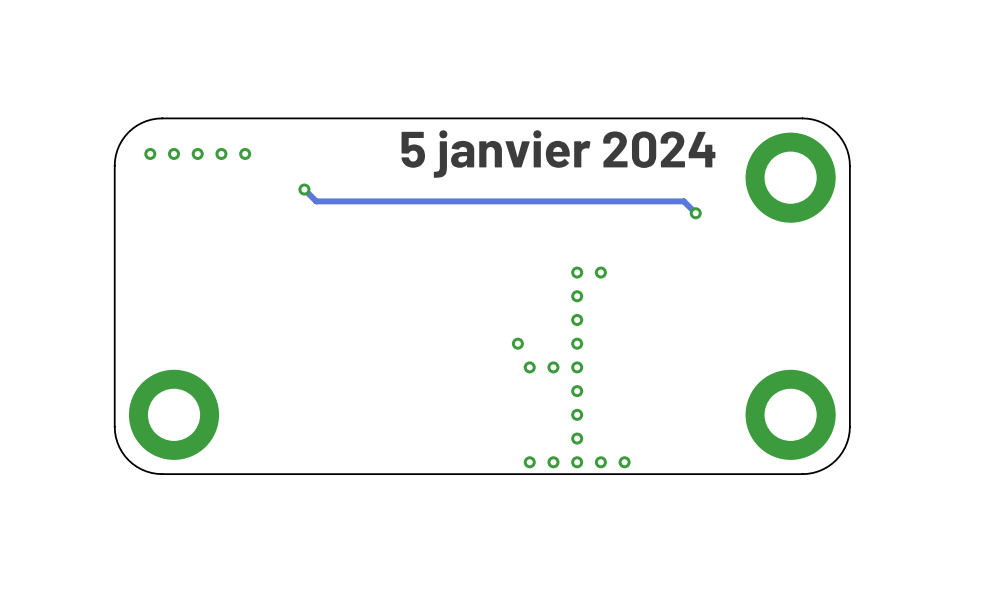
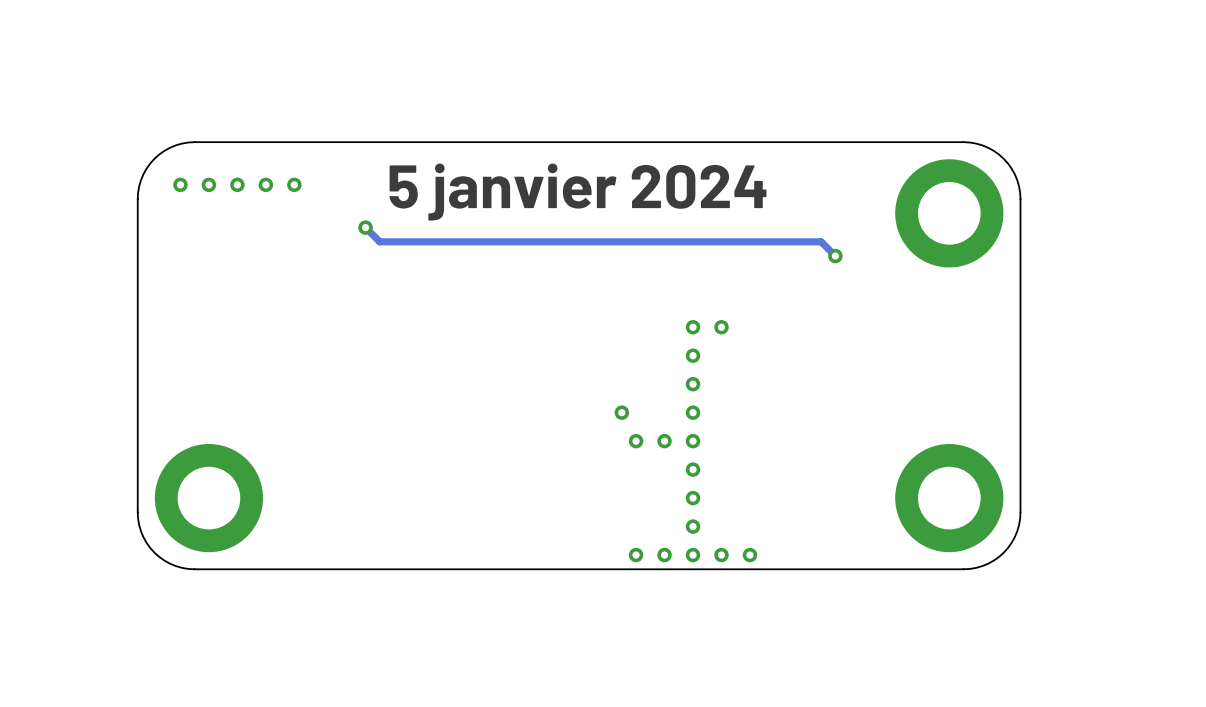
text position: 5 janvier 2024 (558, 154) -> 5 janvier 2024 (577, 192)

